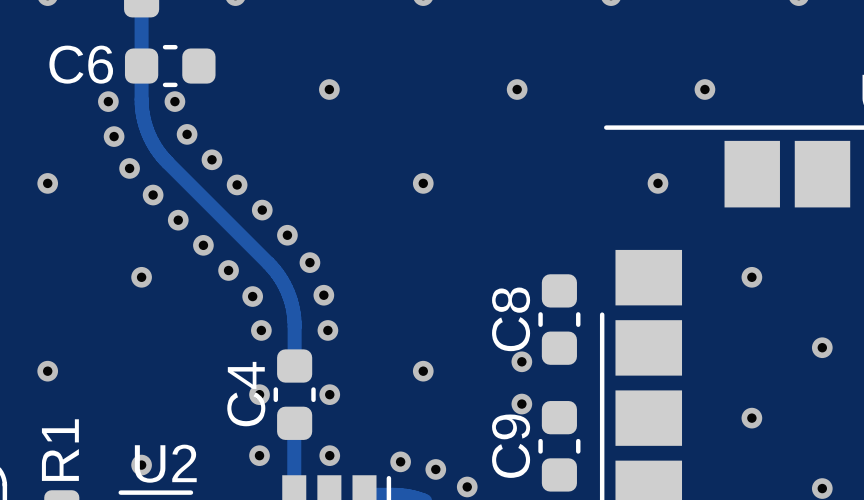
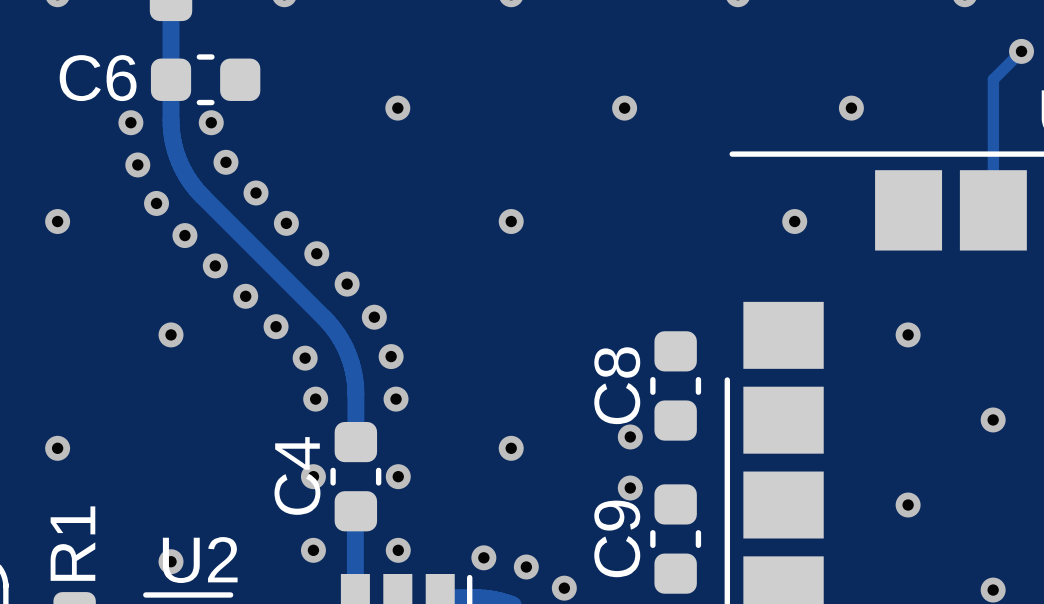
track: none -> (1021, 51) (993, 79) (993, 210)
via: none -> (1021, 51)

